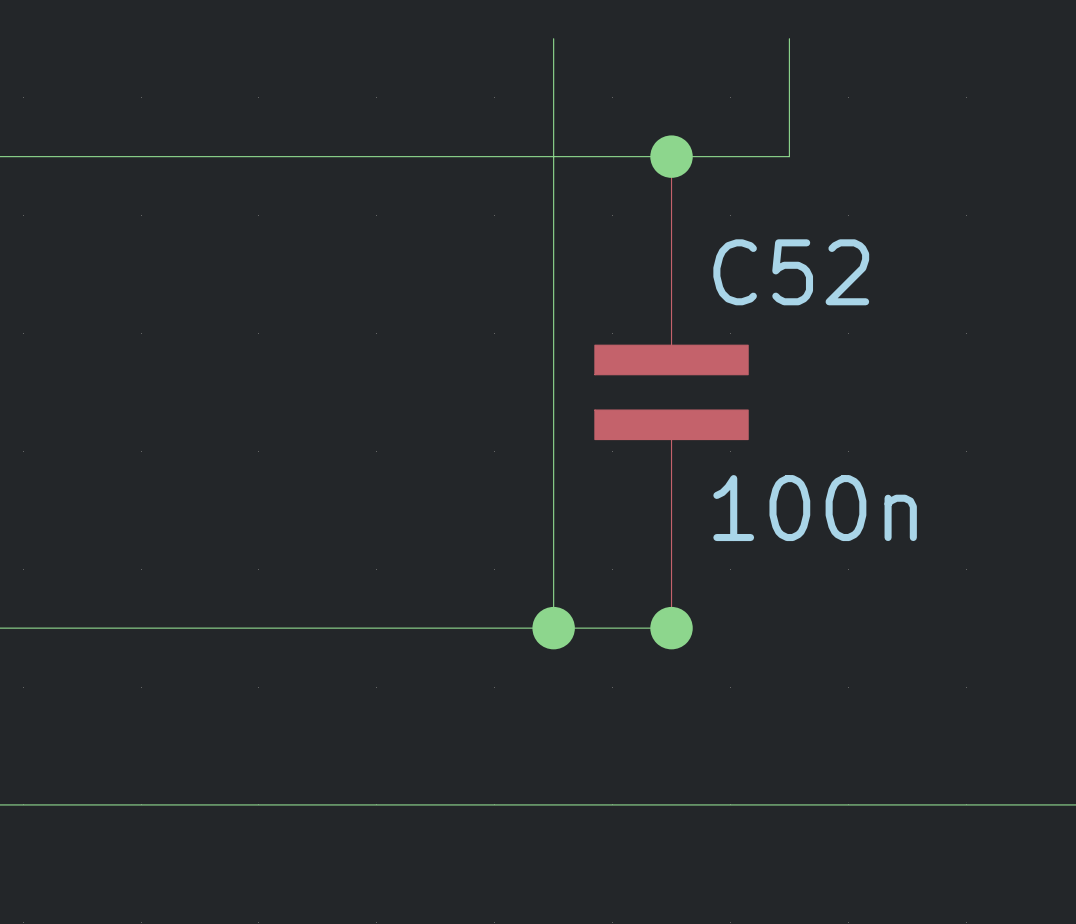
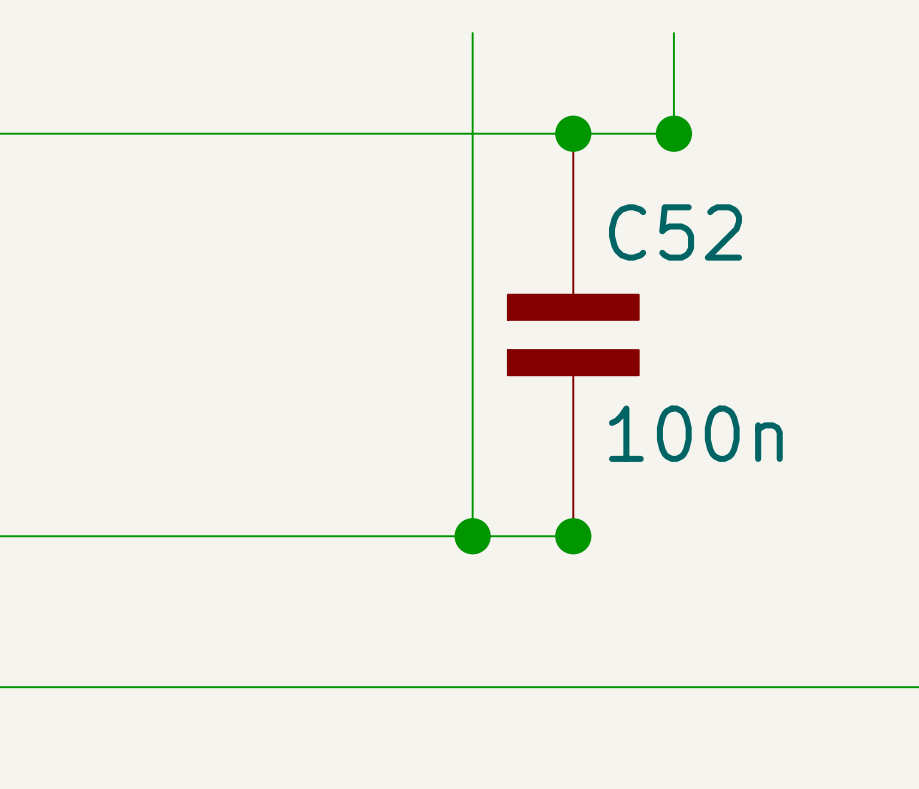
junction: none -> (673, 133)

